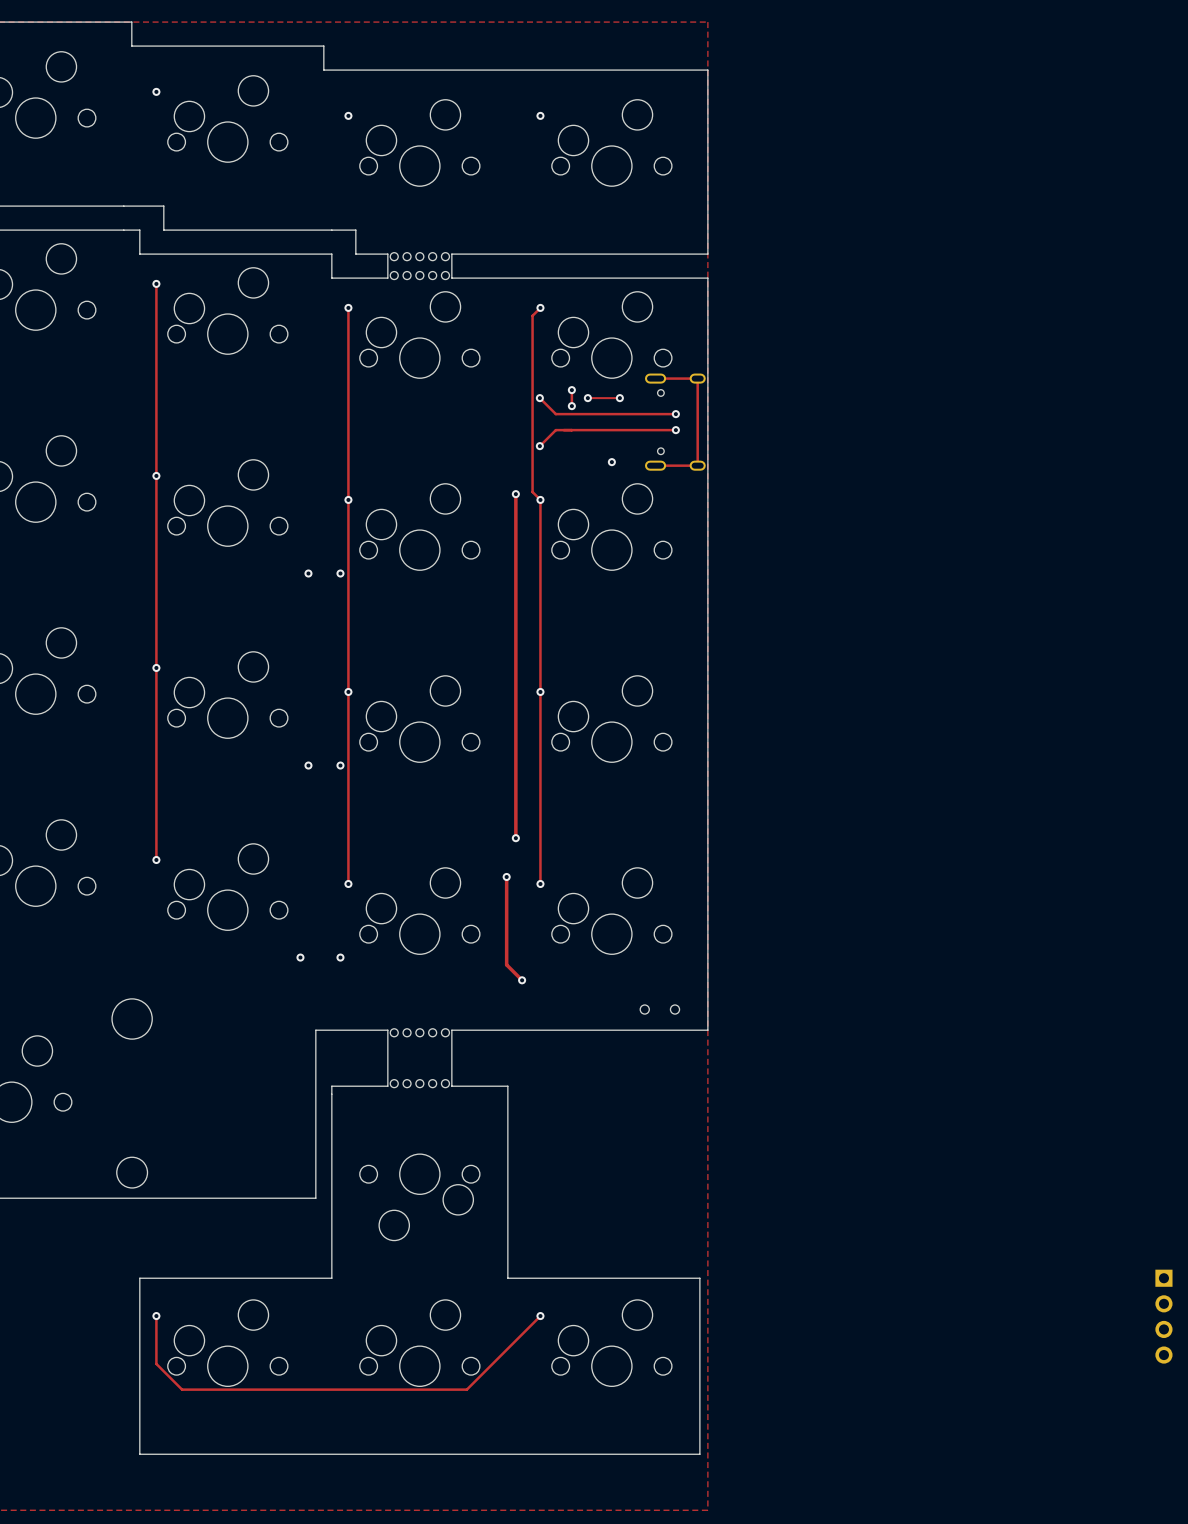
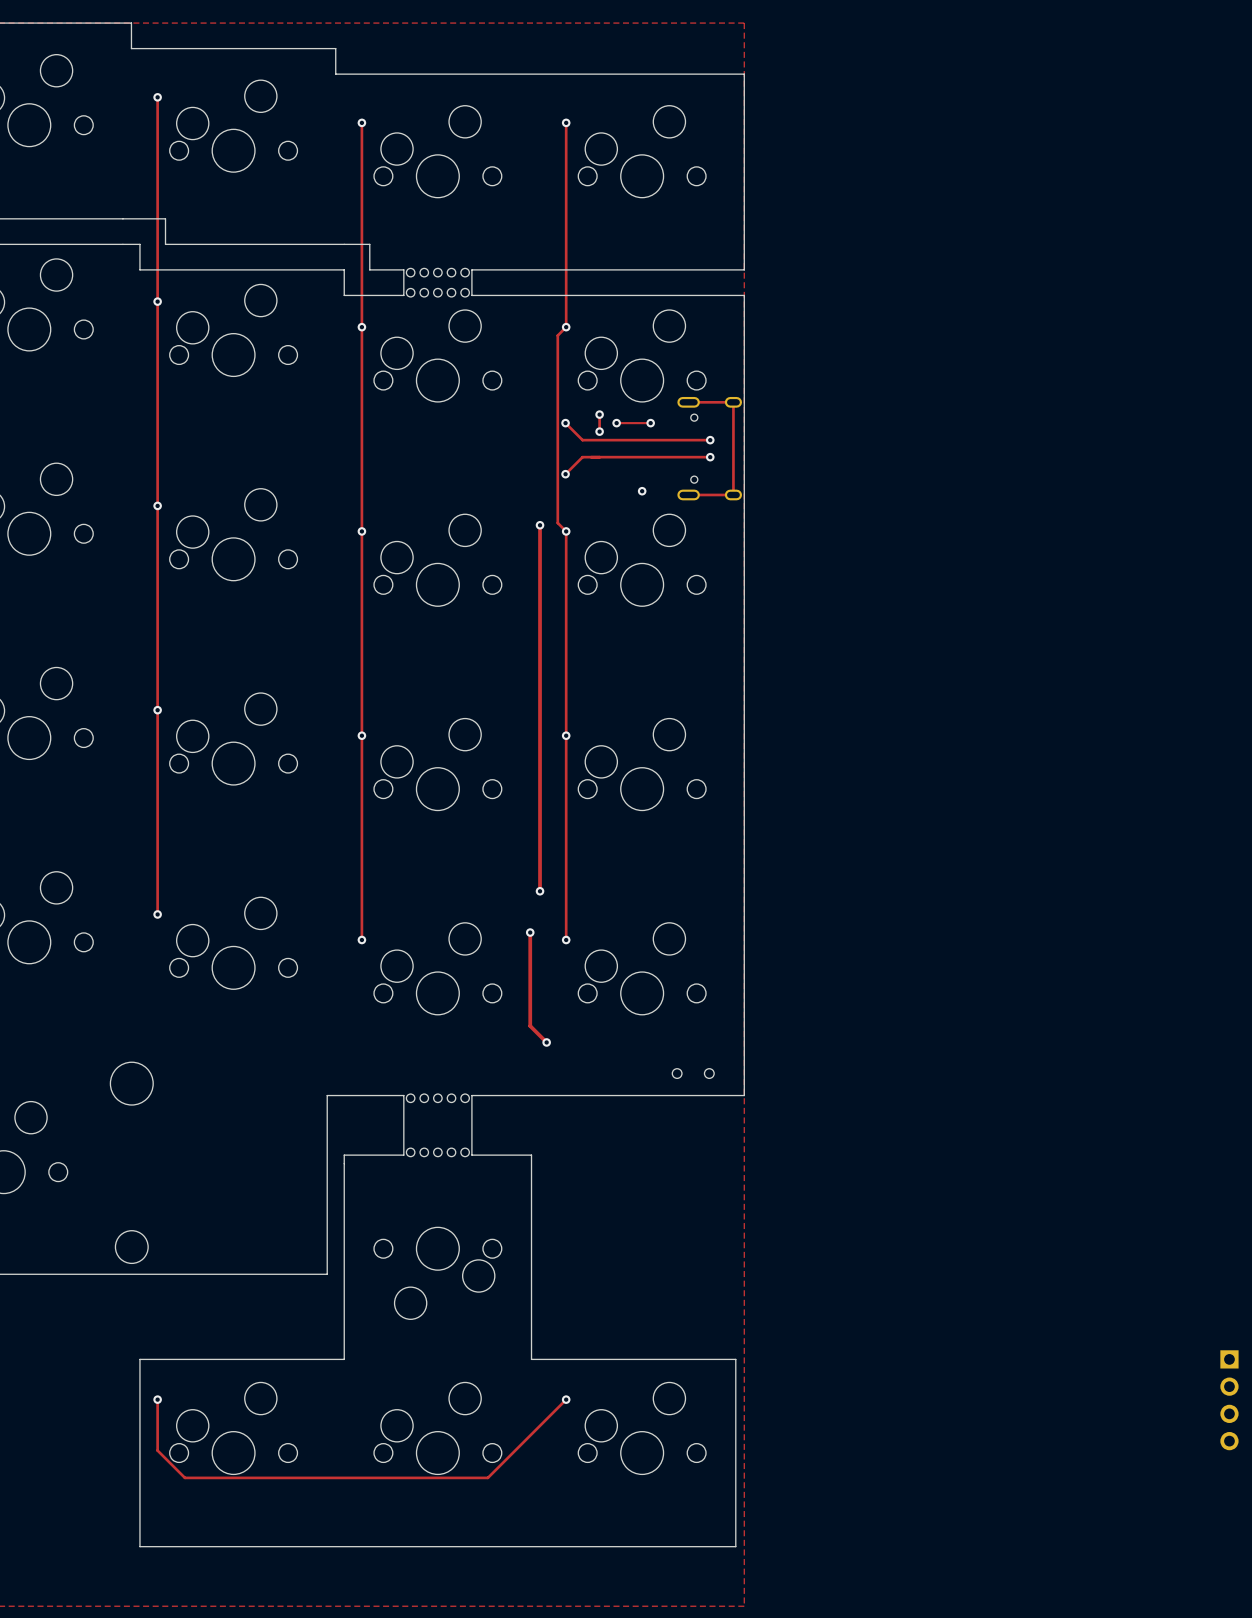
track: none -> (157, 97) (157, 301)
track: none -> (361, 122) (361, 327)
track: none -> (566, 122) (566, 327)
via: (308, 573) -> none
via: (340, 573) -> none
via: (308, 765) -> none
via: (340, 765) -> none
via: (300, 957) -> none
via: (340, 957) -> none

